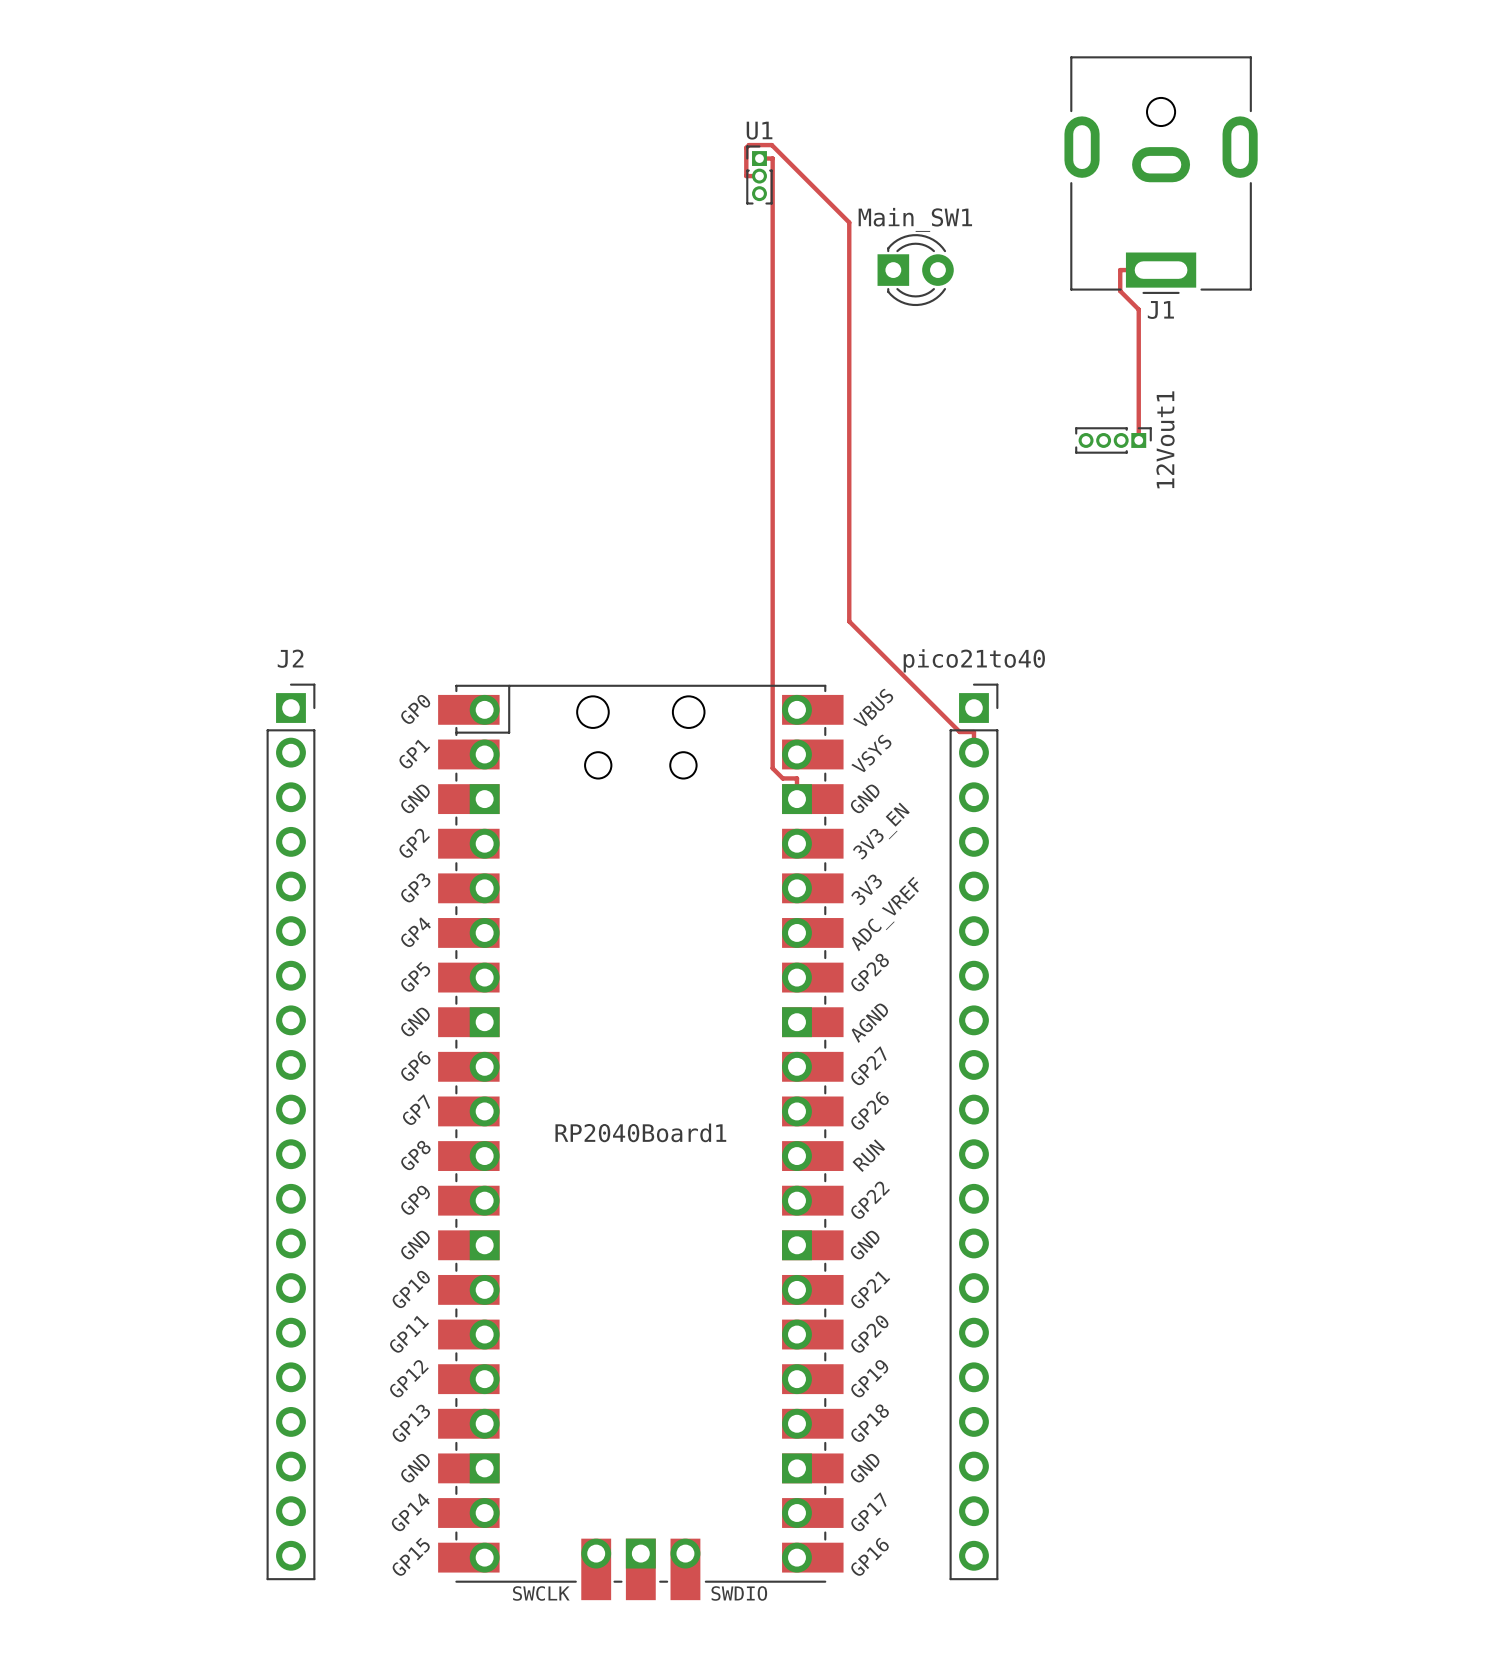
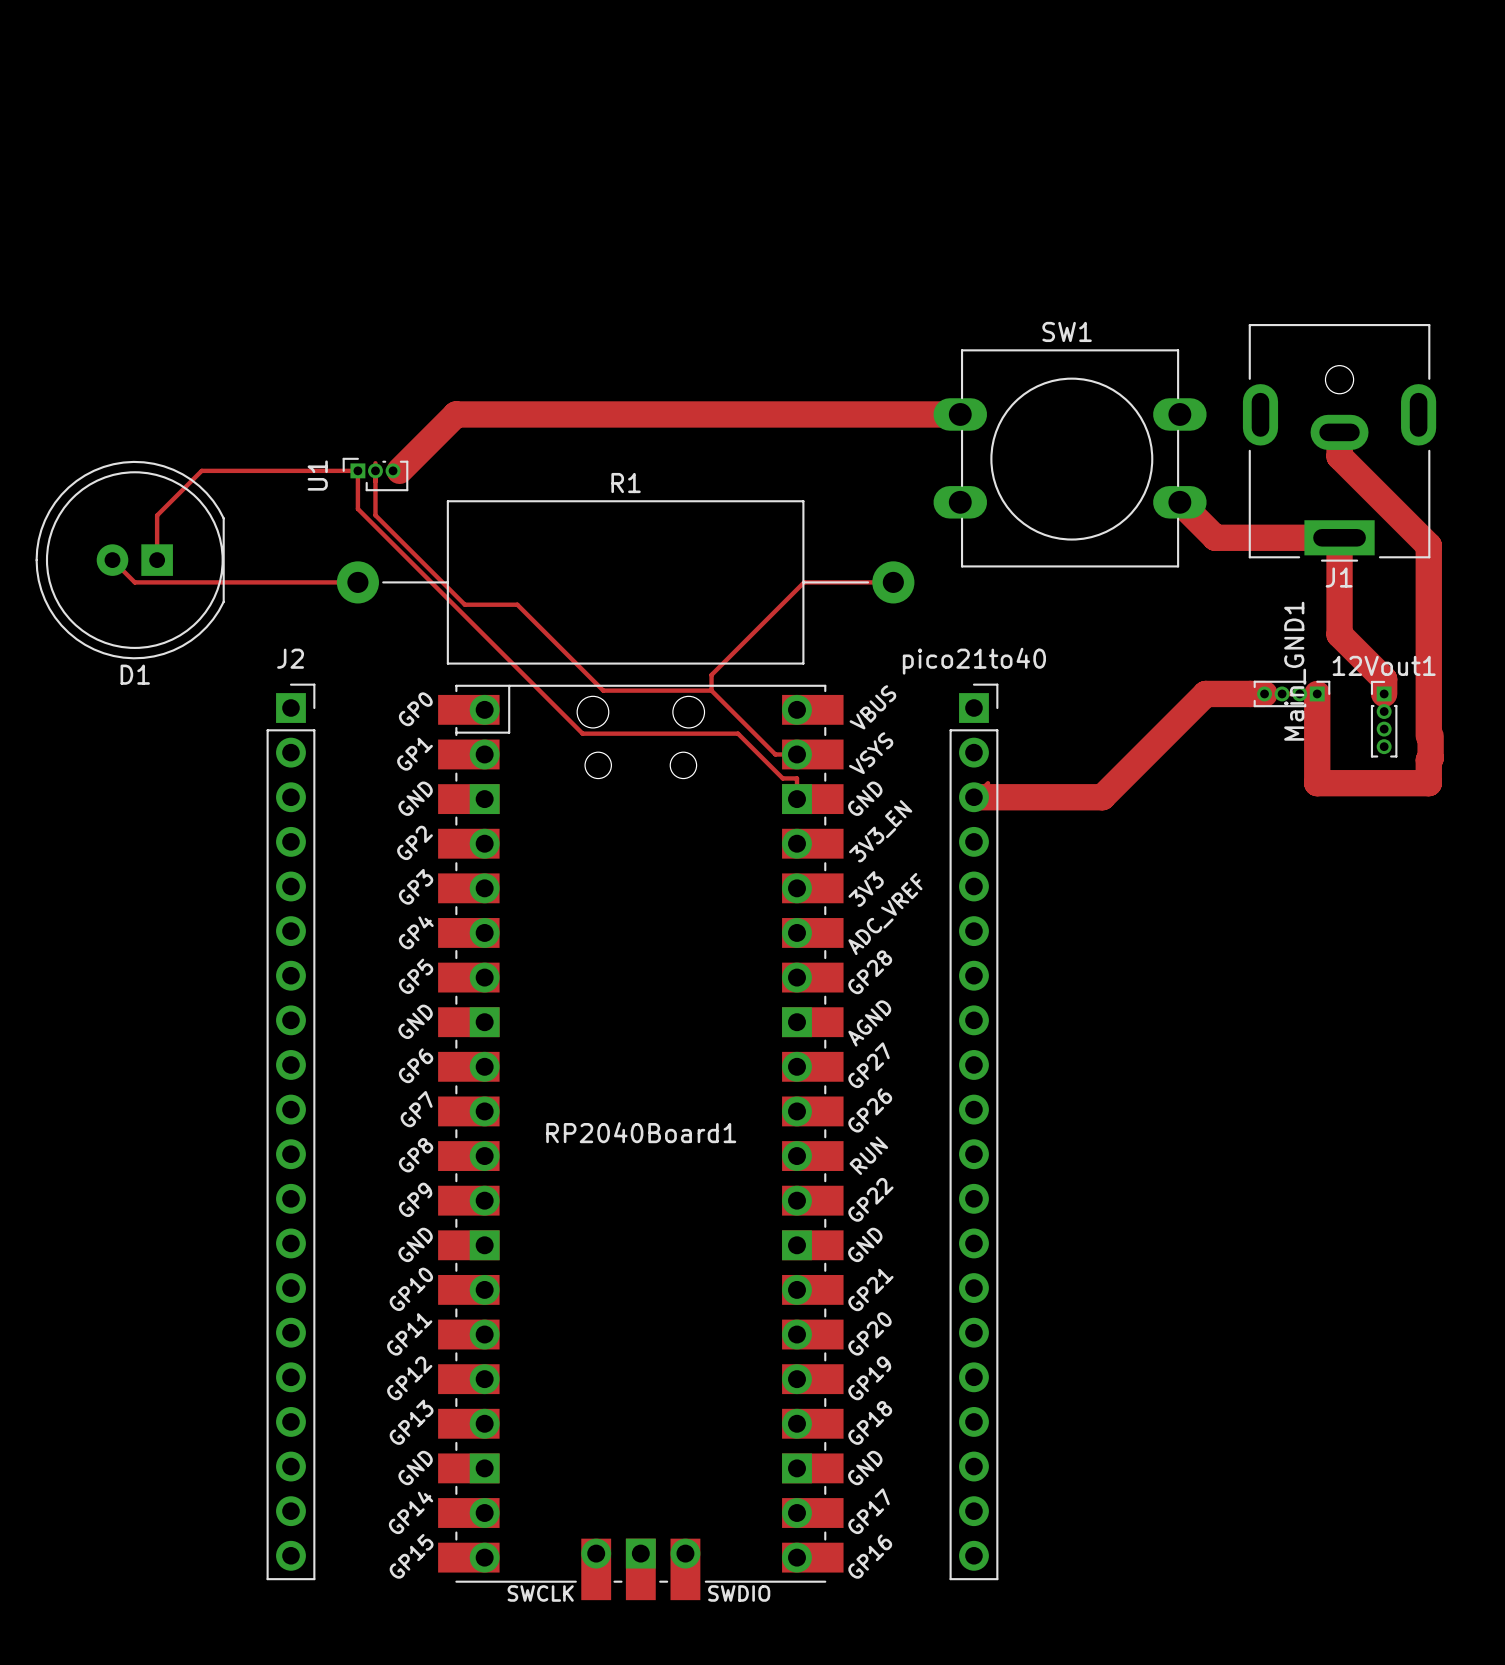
U1 name position: U1 (759, 130) -> U1 (317, 475)
U1 footprint: [746, 145, 773, 205] -> [342, 457, 409, 492]
track: (759, 158) (772, 158) (772, 768) -> (157, 560) (157, 515) (201, 470) (357, 470) (357, 508) (582, 733) (738, 733) (772, 768)
J1 position: (1161, 175) -> (1339, 442)
track: (759, 176) (746, 176) (746, 147) (749, 145) (771, 145) (849, 222) (849, 621) (959, 731) (973, 731) (973, 752) -> none
Main_SW1: (915, 270) -> none
track: (1161, 270) (1120, 270) (1120, 291) (1138, 309) (1138, 440) -> none
track: none -> (960, 414) (456, 414) (399, 470)
track: none -> (1339, 432) (1339, 456) (1428, 545) (1428, 736)
12Vout1 rotation: 0° (1113, 440) -> 90° counterclockwise (1384, 719)
12Vout1 position: (1113, 440) -> (1384, 719)
SW1: none -> (1070, 458)
track: none -> (375, 463) (375, 515) (464, 604) (517, 604) (603, 690) (711, 690)
track: none -> (1179, 502) (1215, 537) (1339, 537) (1339, 634) (1384, 679) (1384, 693)
track: none -> (112, 560) (134, 582) (357, 582)
D1: none -> (130, 560)
R1: none -> (625, 582)
track: none -> (893, 582) (804, 582) (711, 674) (711, 690)
track: none -> (711, 690) (775, 754) (796, 754)
track: none -> (1250, 693) (1317, 693) (1317, 783) (1428, 783) (1430, 736)
track: none -> (1264, 693) (1205, 693) (1102, 797) (973, 797) (988, 783)
Main_GND1: none -> (1291, 693)

